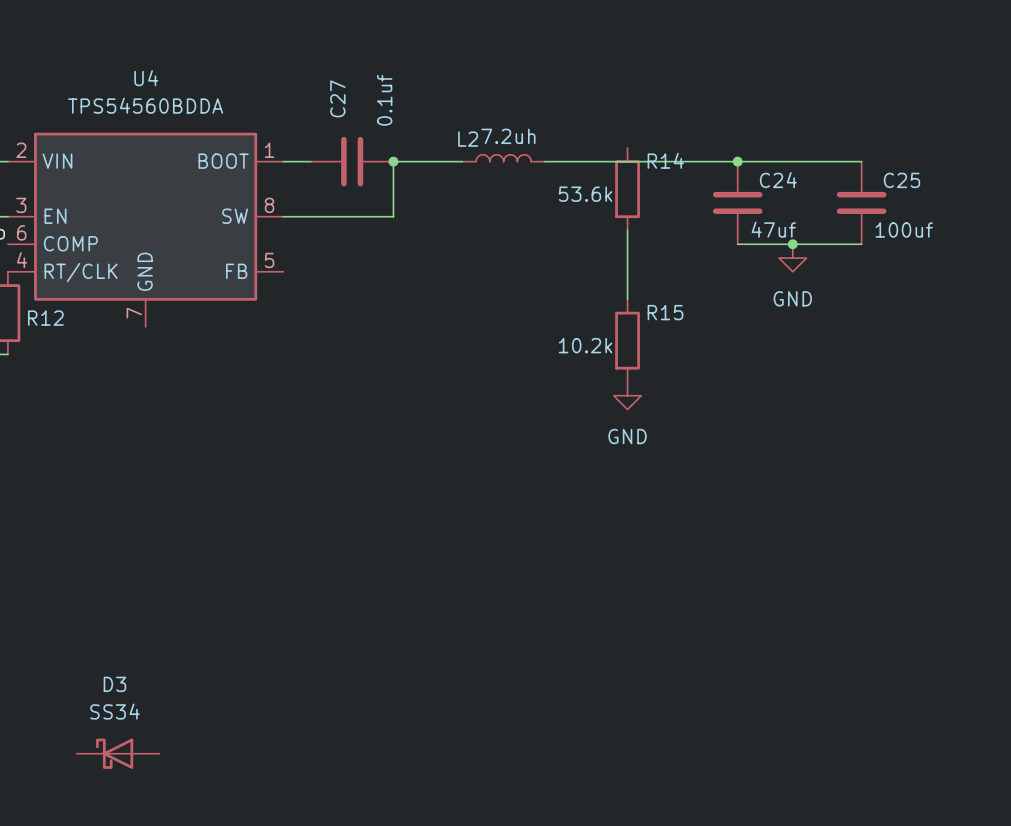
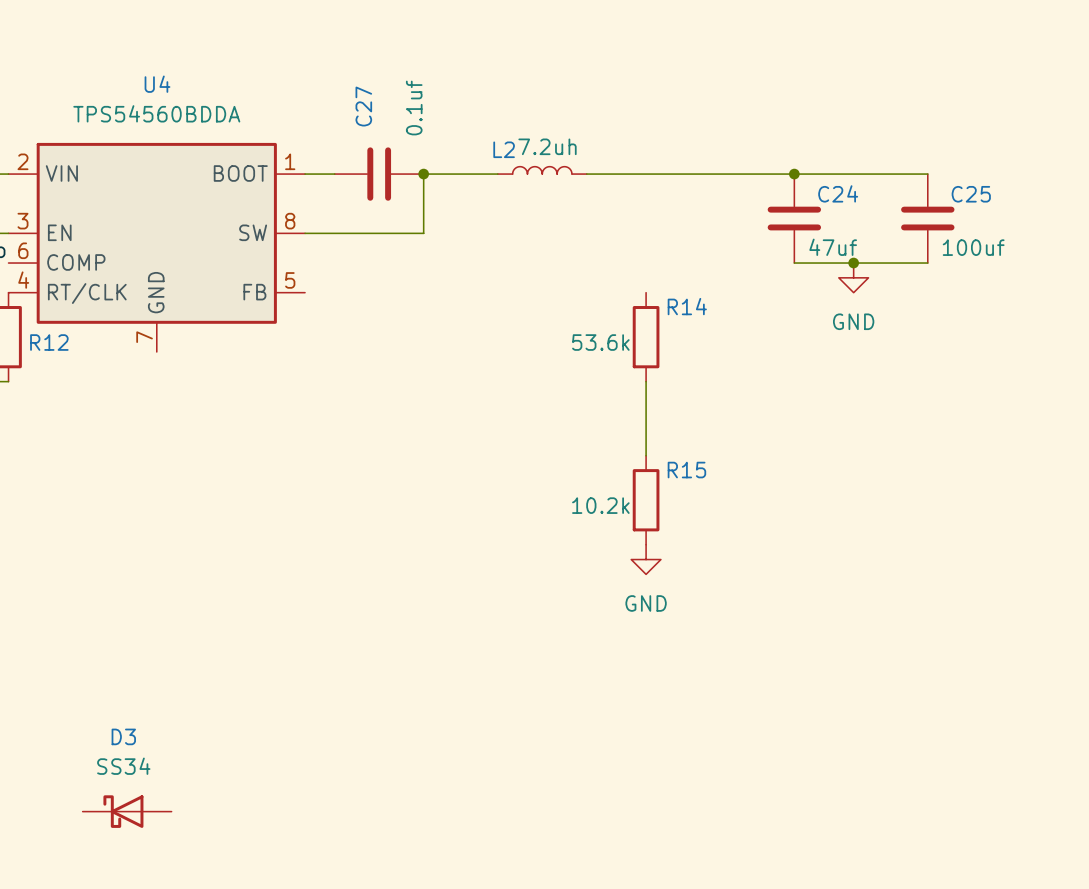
R14 position: (627, 189) -> (646, 337)
wire: (627, 230) (627, 299) -> (646, 381) (646, 455)
R15 position: (627, 340) -> (646, 500)
power symbol position: GND (627, 395) -> GND (646, 559)

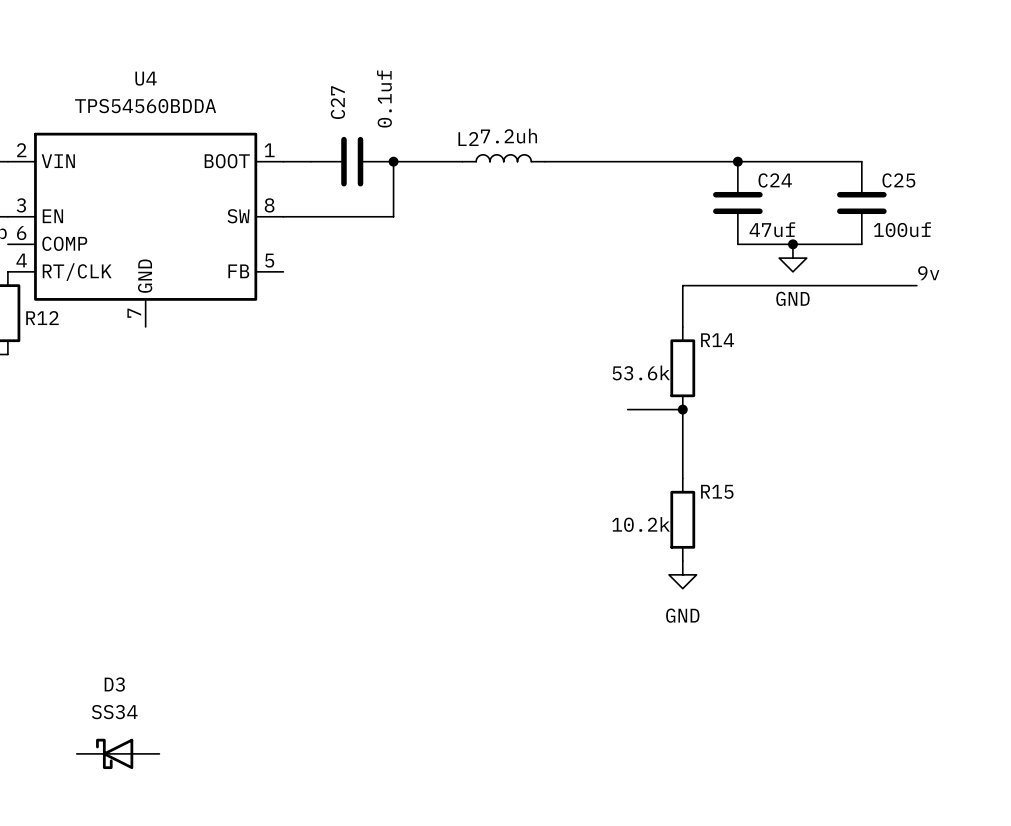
label: none -> 9v (928, 273)
wire: none -> (916, 285) (682, 285) (682, 326)
R14 position: (646, 337) -> (682, 368)
wire: (646, 381) (646, 455) -> none
wire: none -> (627, 409) (682, 409) (682, 478)
junction: none -> (682, 409)
R15 position: (646, 500) -> (682, 519)
power symbol position: GND (646, 559) -> GND (682, 574)

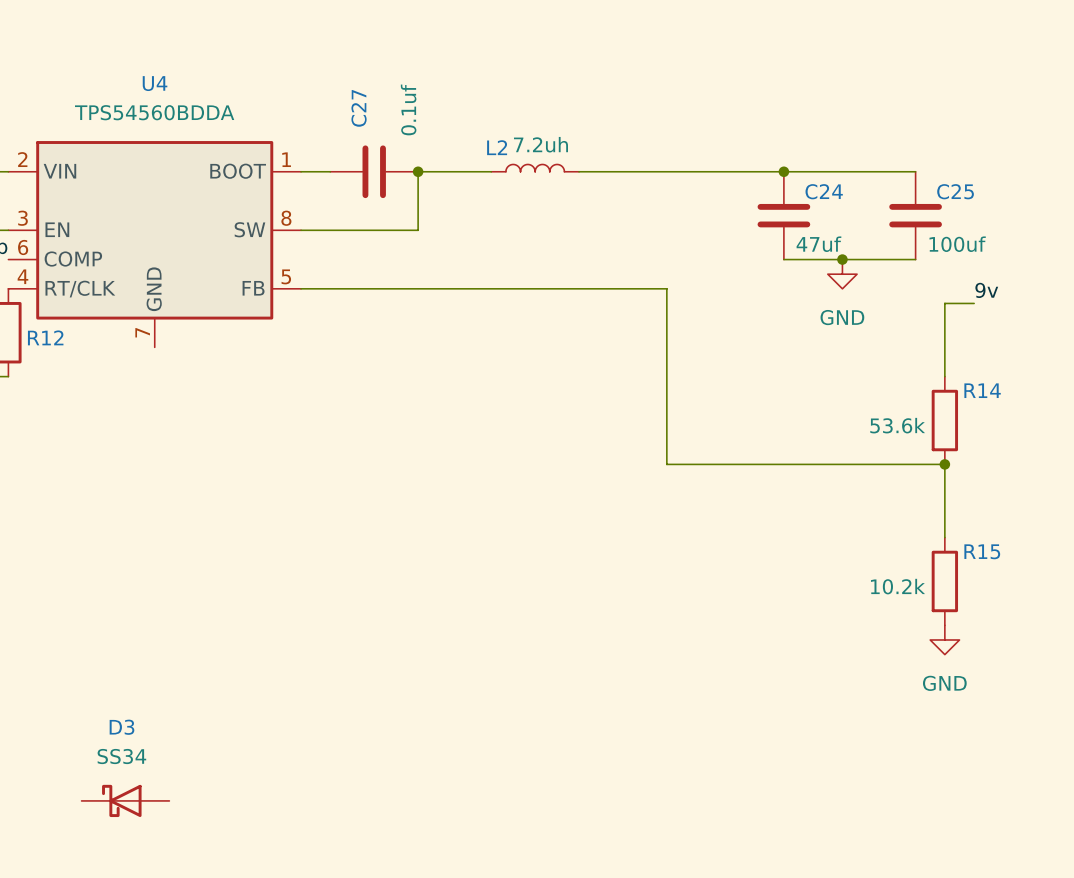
wire: none -> (301, 288) (666, 288) (666, 464) (944, 464) (944, 537)
wire: (889, 285) (682, 285) (682, 326) -> (944, 303) (944, 376)
R14 position: (682, 368) -> (944, 420)
wire: (627, 409) (682, 409) (682, 478) -> none
junction: (682, 409) -> none
junction: none -> (944, 464)
R15 position: (682, 519) -> (944, 581)
power symbol position: GND (682, 574) -> GND (944, 639)

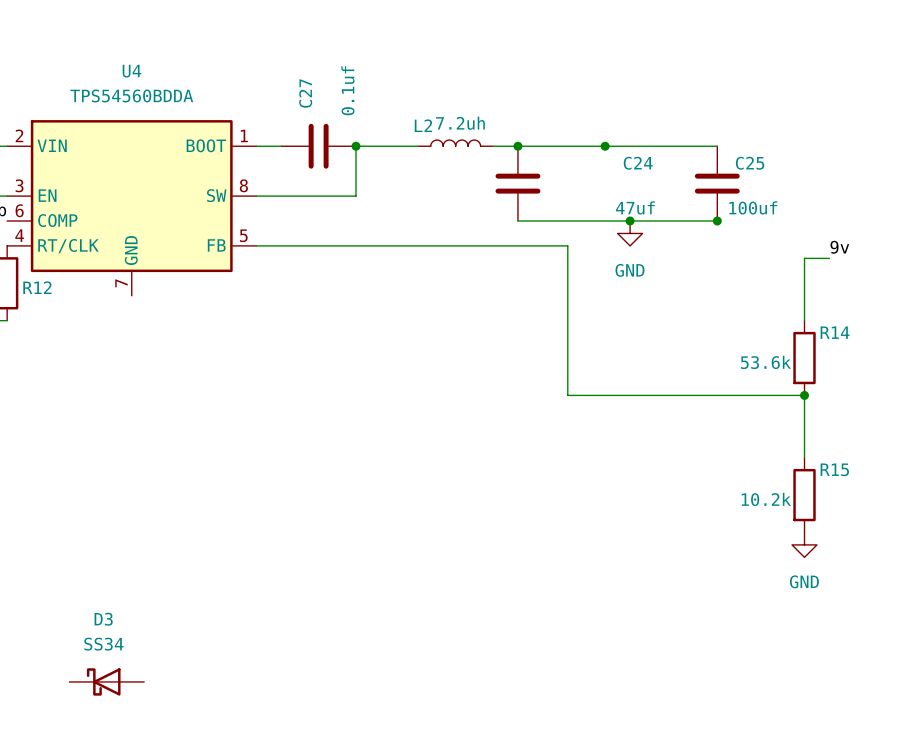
junction: none -> (517, 146)
junction: none -> (605, 146)
junction: (783, 171) -> none
wire: (842, 171) (915, 171) -> none
C24 name position: C24 (824, 191) -> C24 (638, 163)
C24 position: (783, 215) -> (517, 183)
C25 position: (915, 215) -> (717, 183)
C24 value position: 47uf (818, 244) -> 47uf (635, 207)
wire: none -> (517, 221) (667, 221)
junction: none -> (630, 221)
wire: (842, 259) (915, 259) -> none
power symbol position: GND (842, 274) -> GND (630, 233)

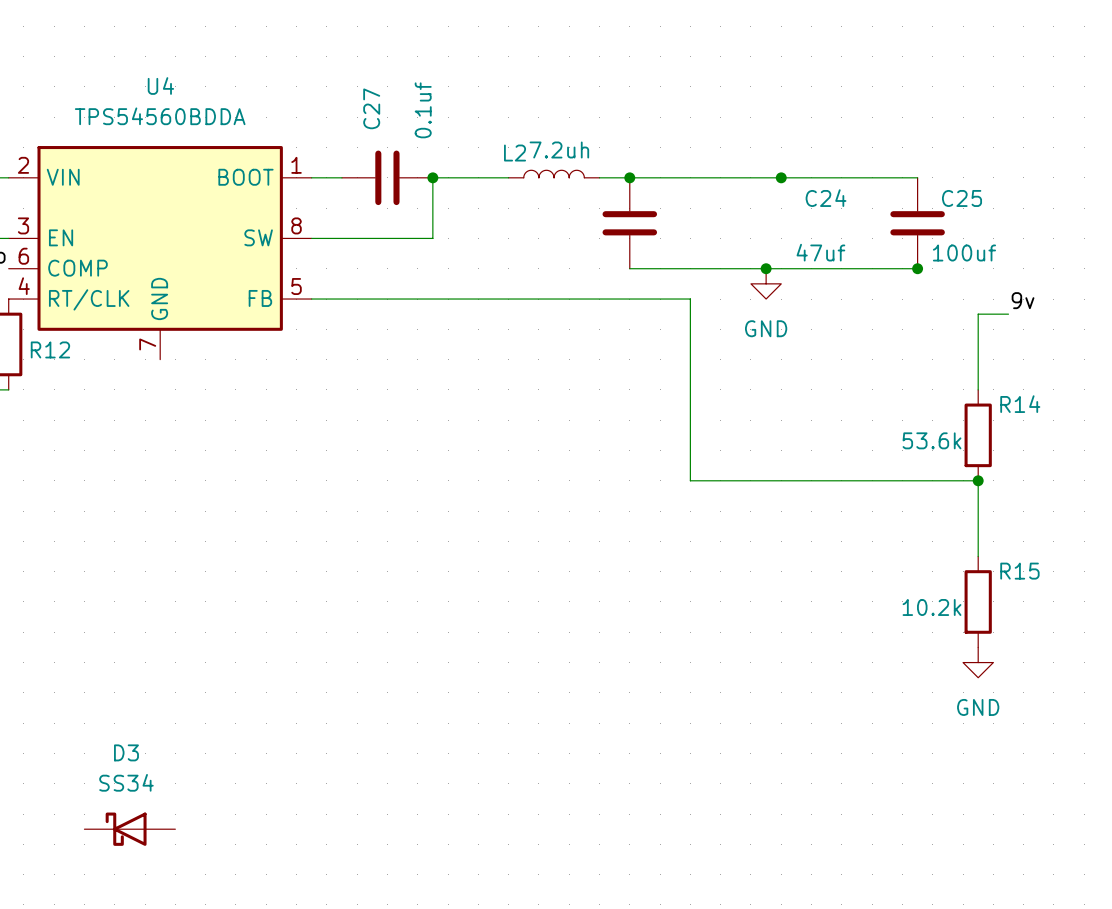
junction position: (605, 146) -> (781, 177)
wire: none -> (872, 177) (917, 177)
C24 name position: C24 (638, 163) -> C24 (826, 198)
C25 position: (717, 183) -> (917, 223)
C24 value position: 47uf (635, 207) -> 47uf (820, 252)
wire: none -> (872, 268) (917, 268)
junction position: (717, 221) -> (917, 268)

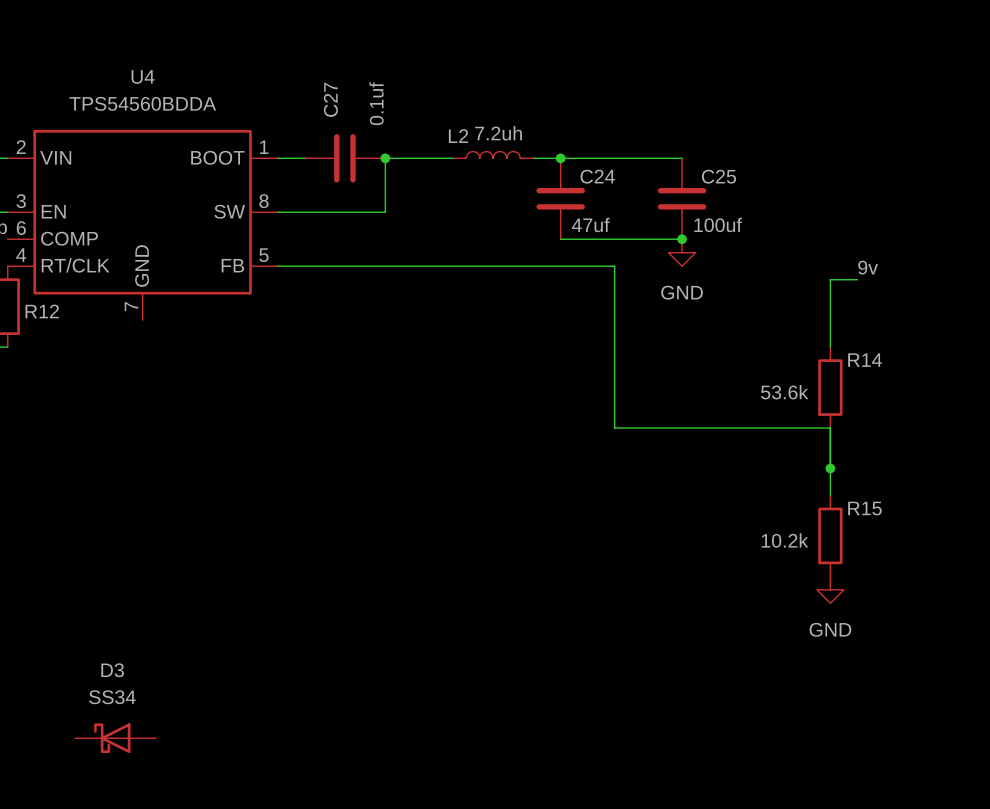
wire: (766, 177) (917, 177) -> none
junction: (781, 177) -> none
C24 name position: C24 (826, 198) -> C24 (597, 176)
C25 position: (917, 223) -> (682, 198)
C24 value position: 47uf (820, 252) -> 47uf (590, 224)
wire: (766, 268) (917, 268) -> none
junction: (917, 268) -> none
label position: 9v (1023, 300) -> 9v (868, 267)
wire: (1008, 314) (978, 314) (978, 389) -> (857, 279) (830, 279) (830, 347)
R14 position: (978, 435) -> (830, 387)
wire: (932, 480) (978, 480) (978, 556) -> (830, 428) (830, 495)
junction position: (978, 480) -> (830, 468)
R15 position: (978, 601) -> (830, 535)
power symbol position: GND (978, 662) -> GND (830, 589)

